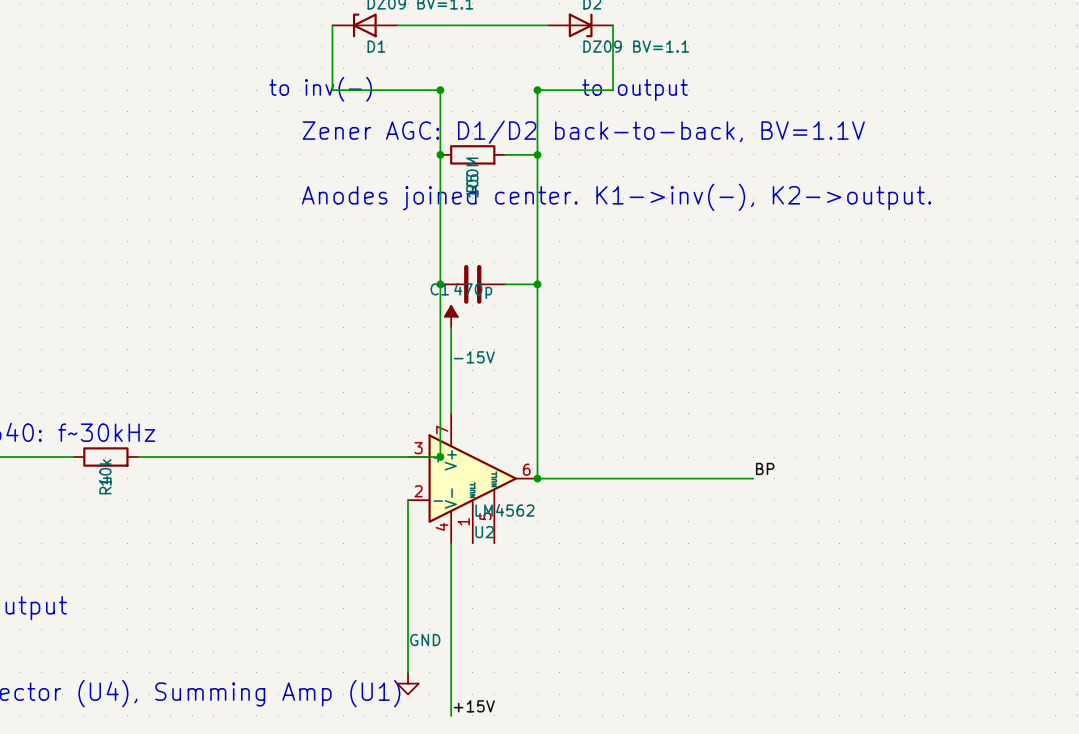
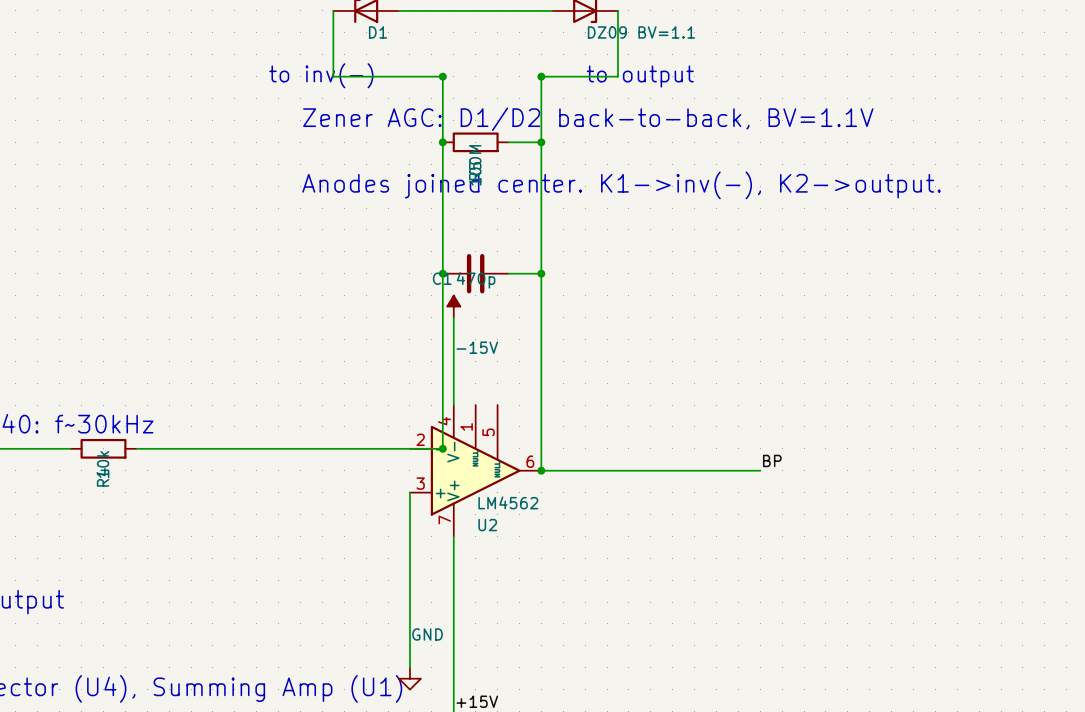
U2 flip: as is (472, 478) -> up-down (475, 470)

